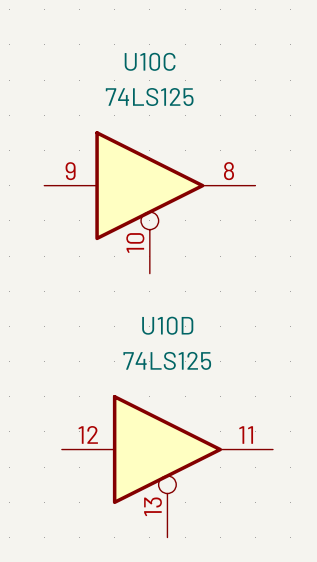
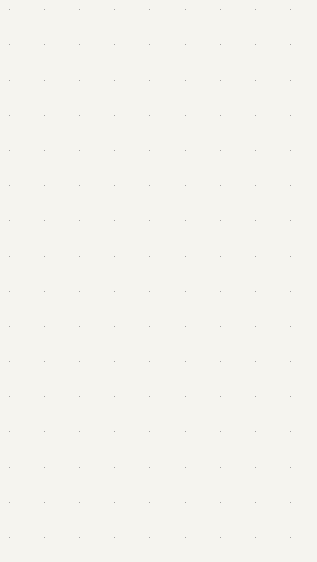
U10C: 74LS125 (149, 202) -> none
U10D: 74LS125 (167, 466) -> none

